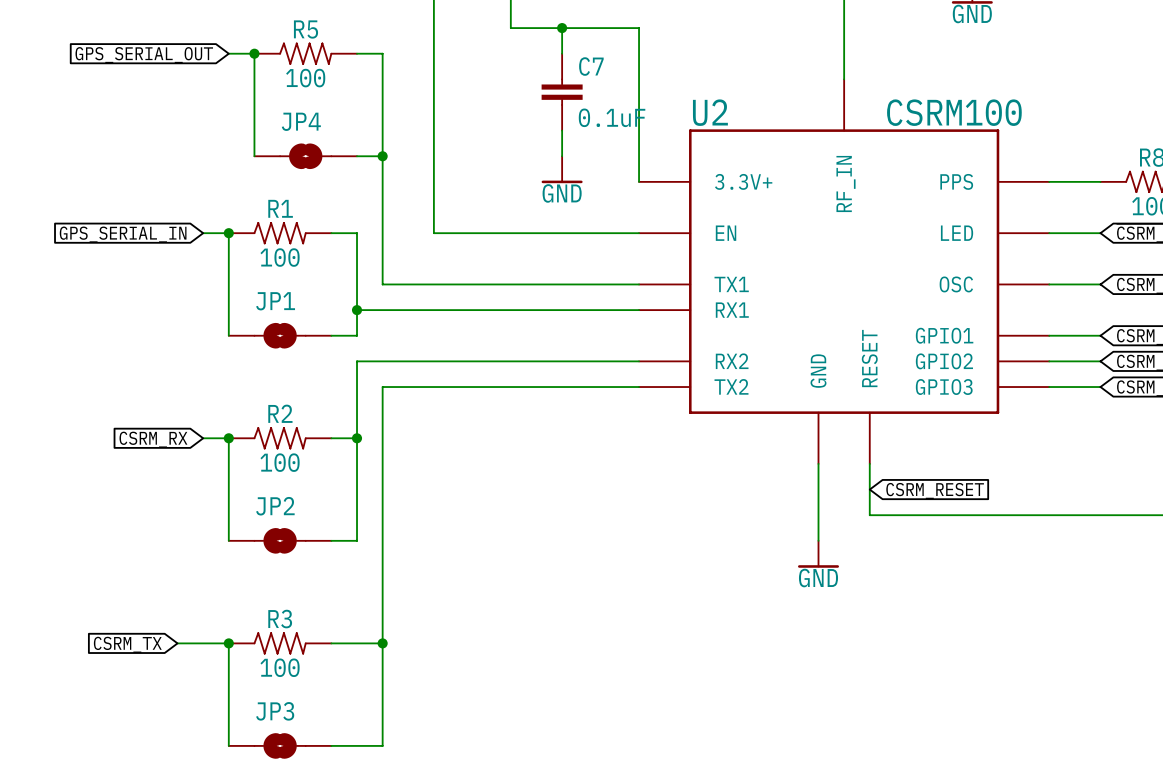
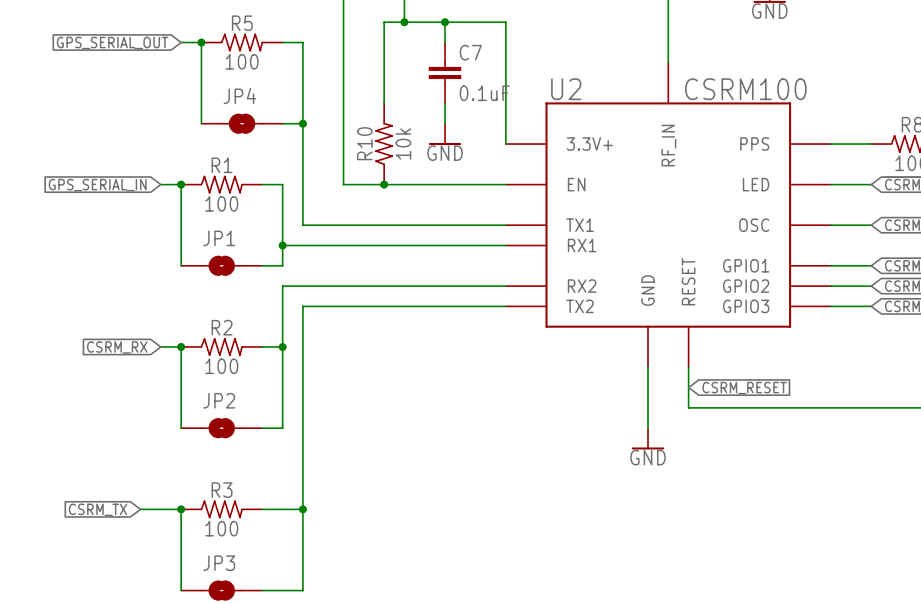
wire: none -> (404, 22) (384, 22) (384, 103)
junction: none -> (404, 22)
R10: none -> 10k (384, 144)
junction: none -> (384, 184)

